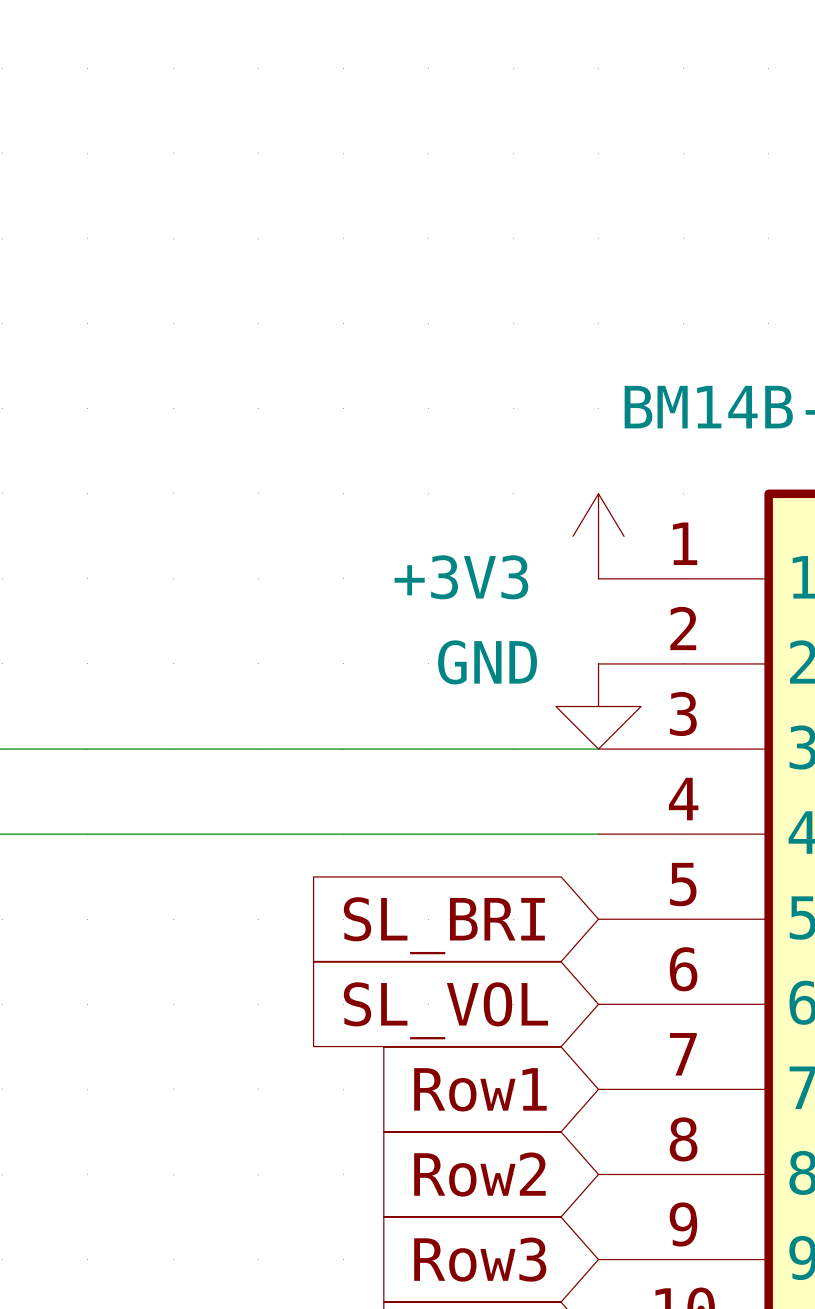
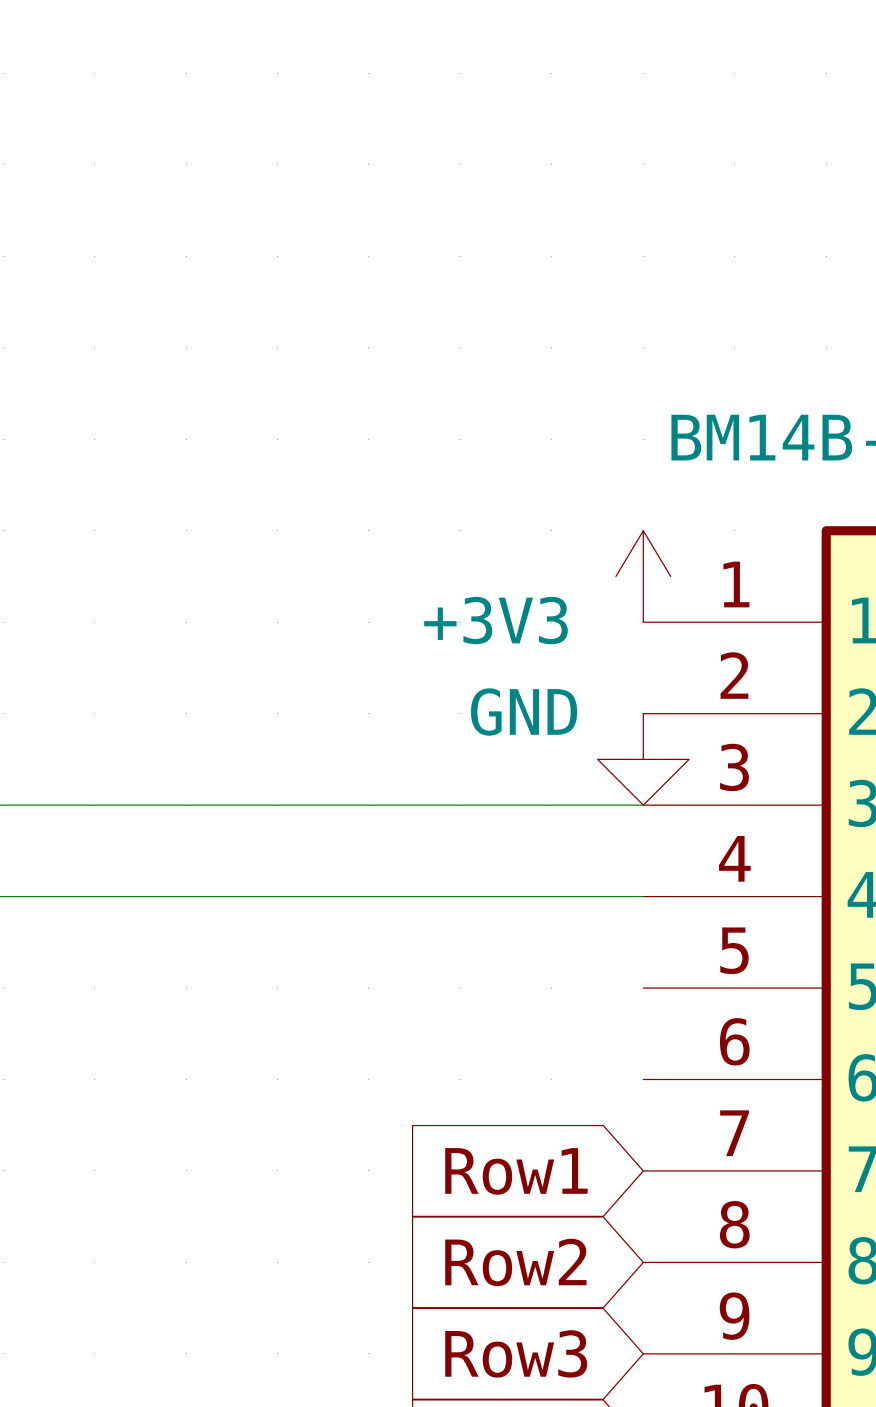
global label: SL_BRI (444, 925) -> none
global label: SL_VOL (445, 1010) -> none

